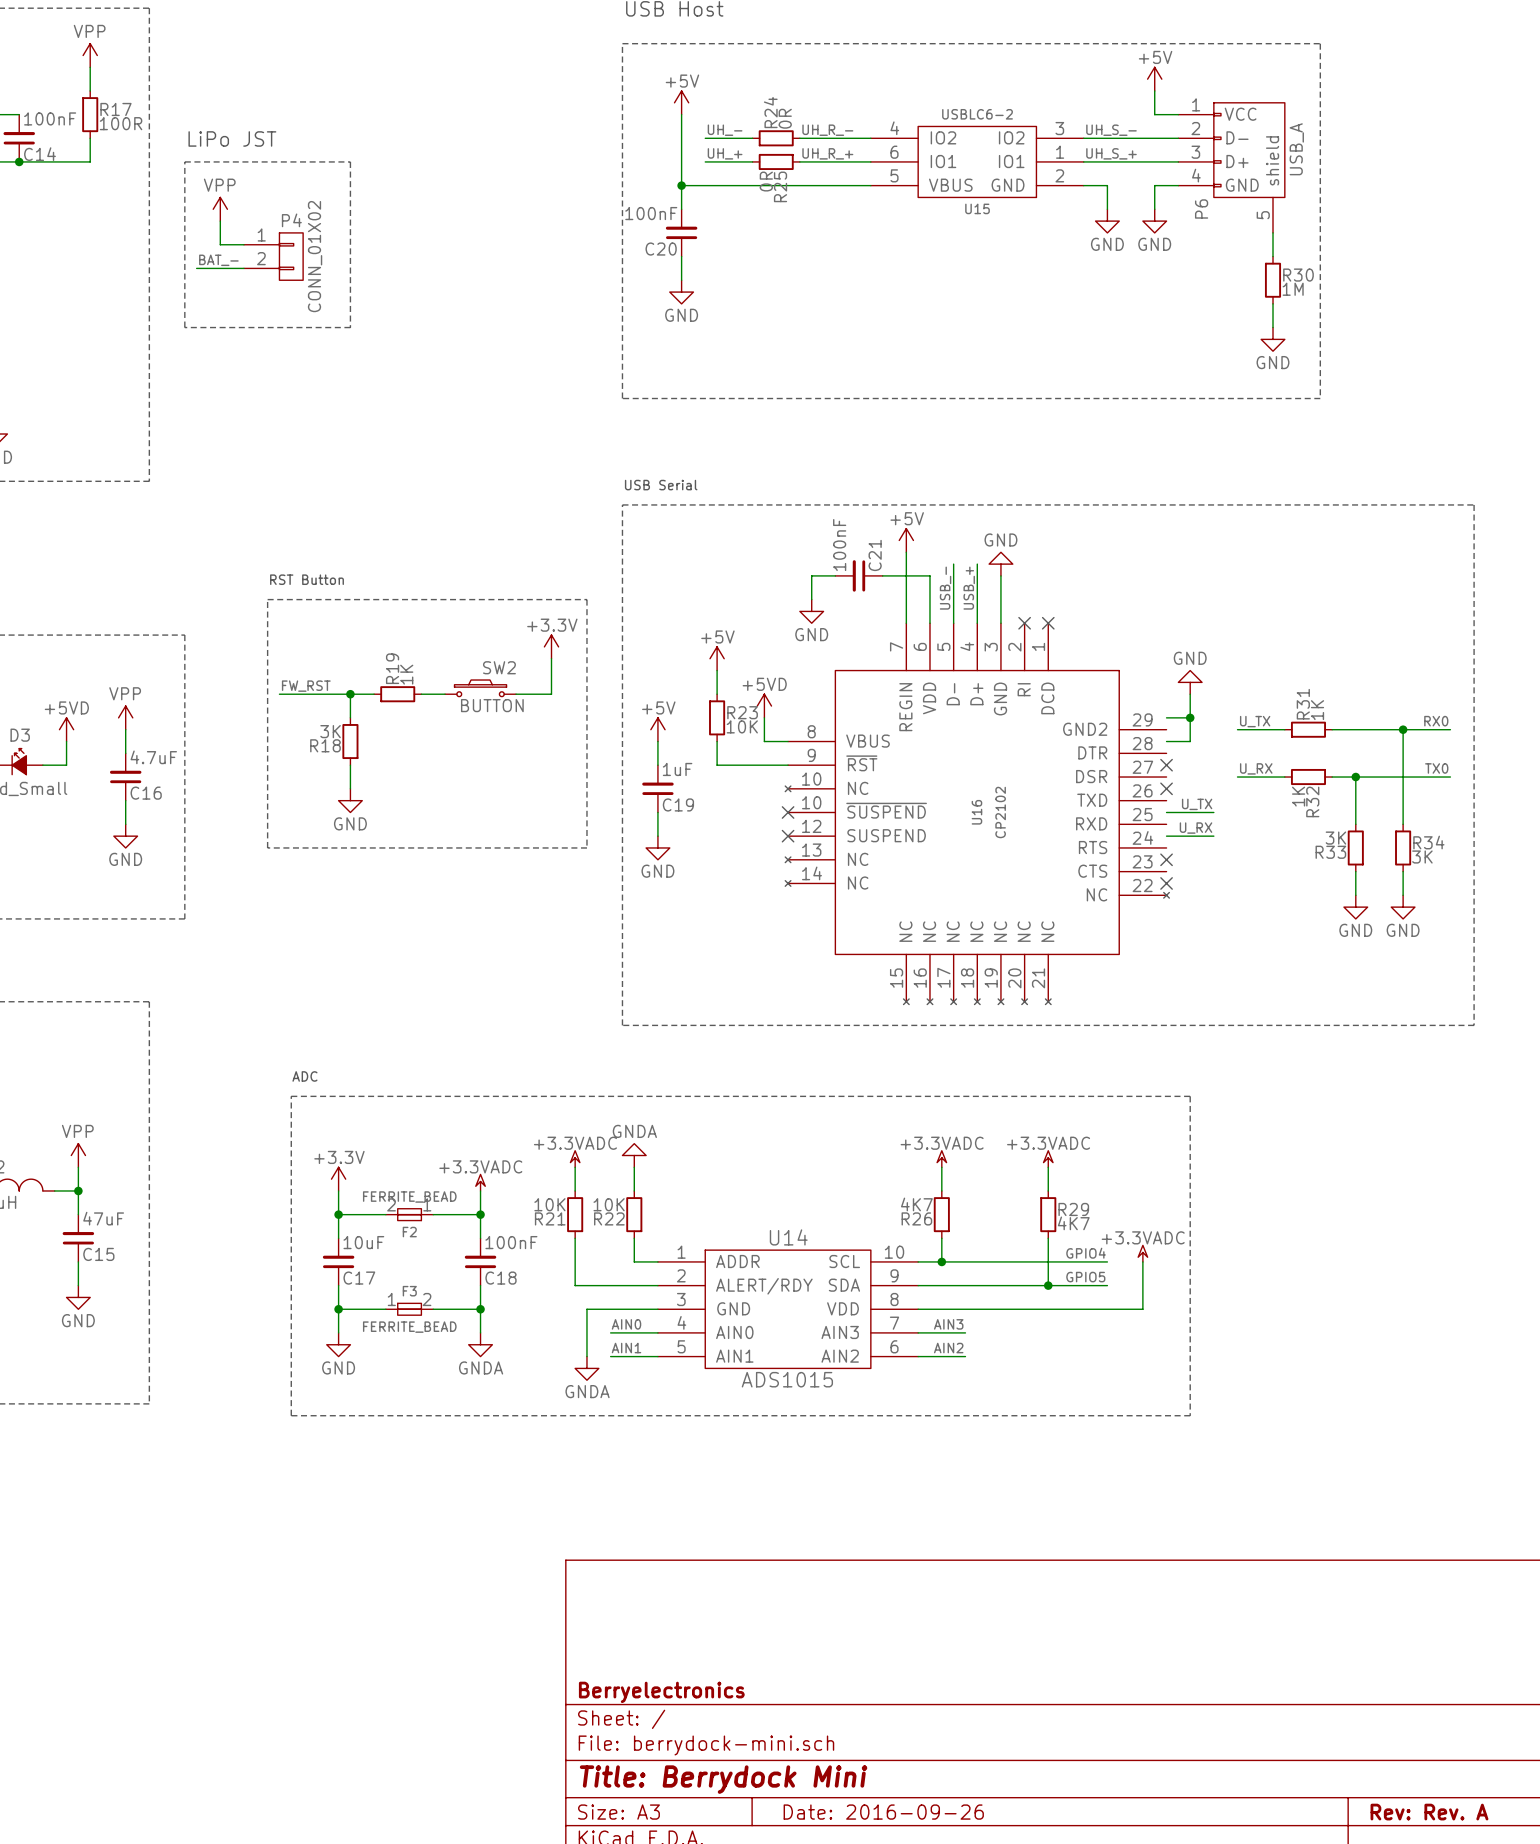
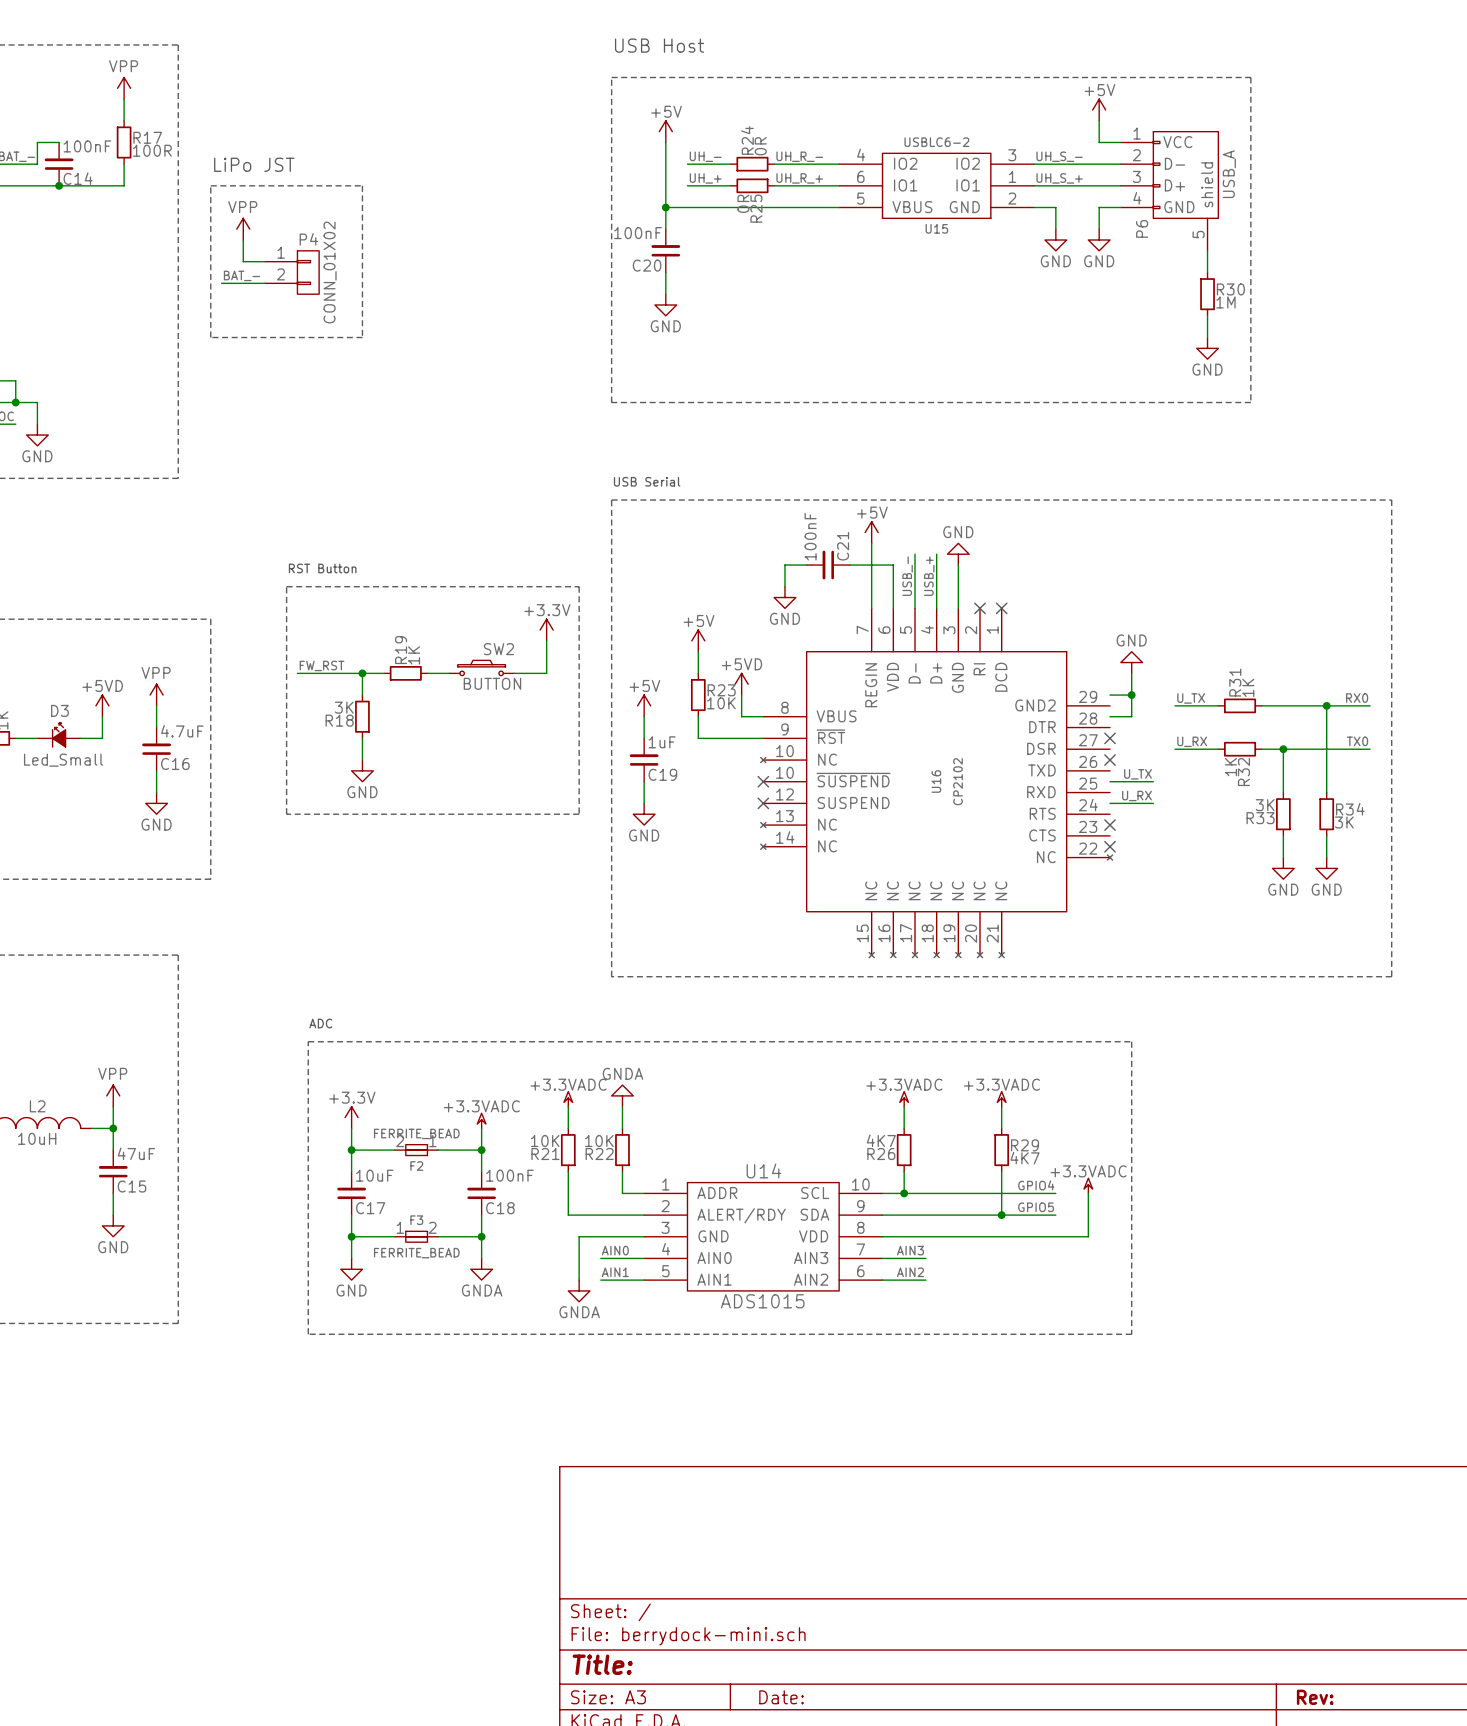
title block: Berryelectronics (661, 1692) -> none
title block: Title: Berrydock Mini (723, 1779) -> Title: (602, 1664)
title block: Date: 2016-09-26 (883, 1812) -> Date: (781, 1697)
title block: Rev: Rev. A (1429, 1812) -> Rev: (1315, 1697)

